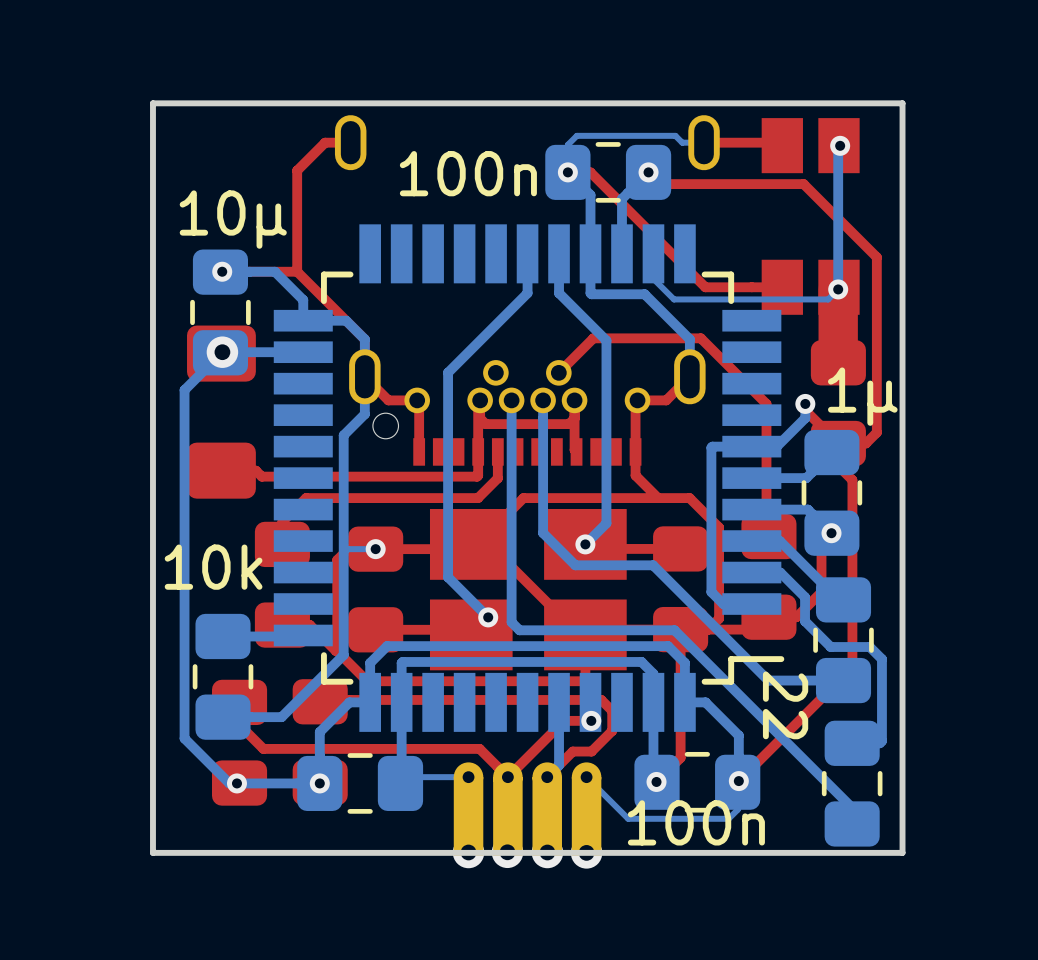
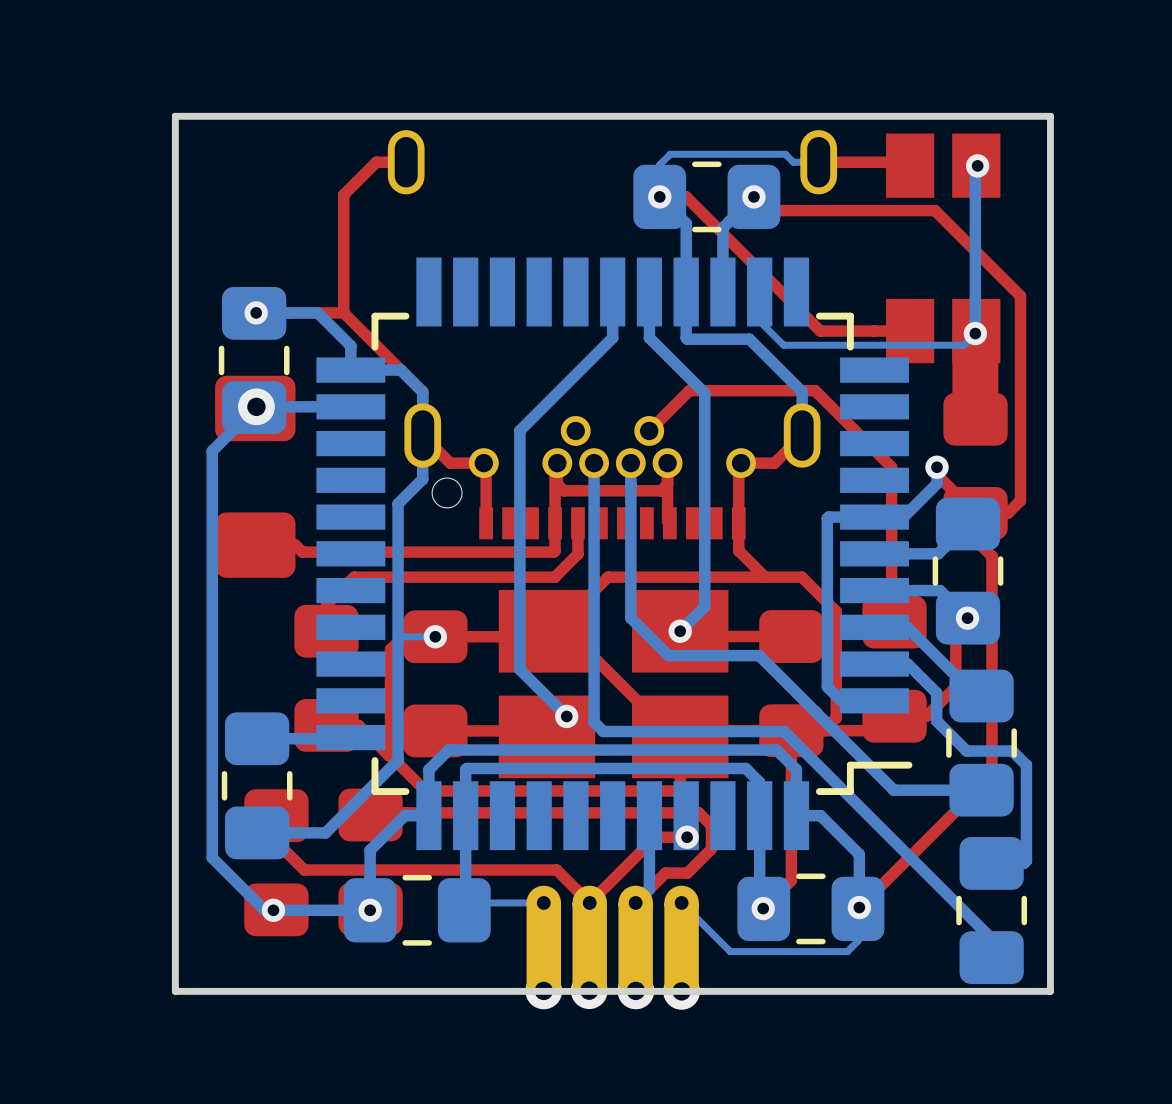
part value: 100n (468, 173) -> none
part value: 10μ (233, 219) -> none
part value: 1μ (862, 396) -> none
part value: 10k (213, 567) -> none
part value: 22 (785, 705) -> none
part value: 100n (696, 822) -> none

